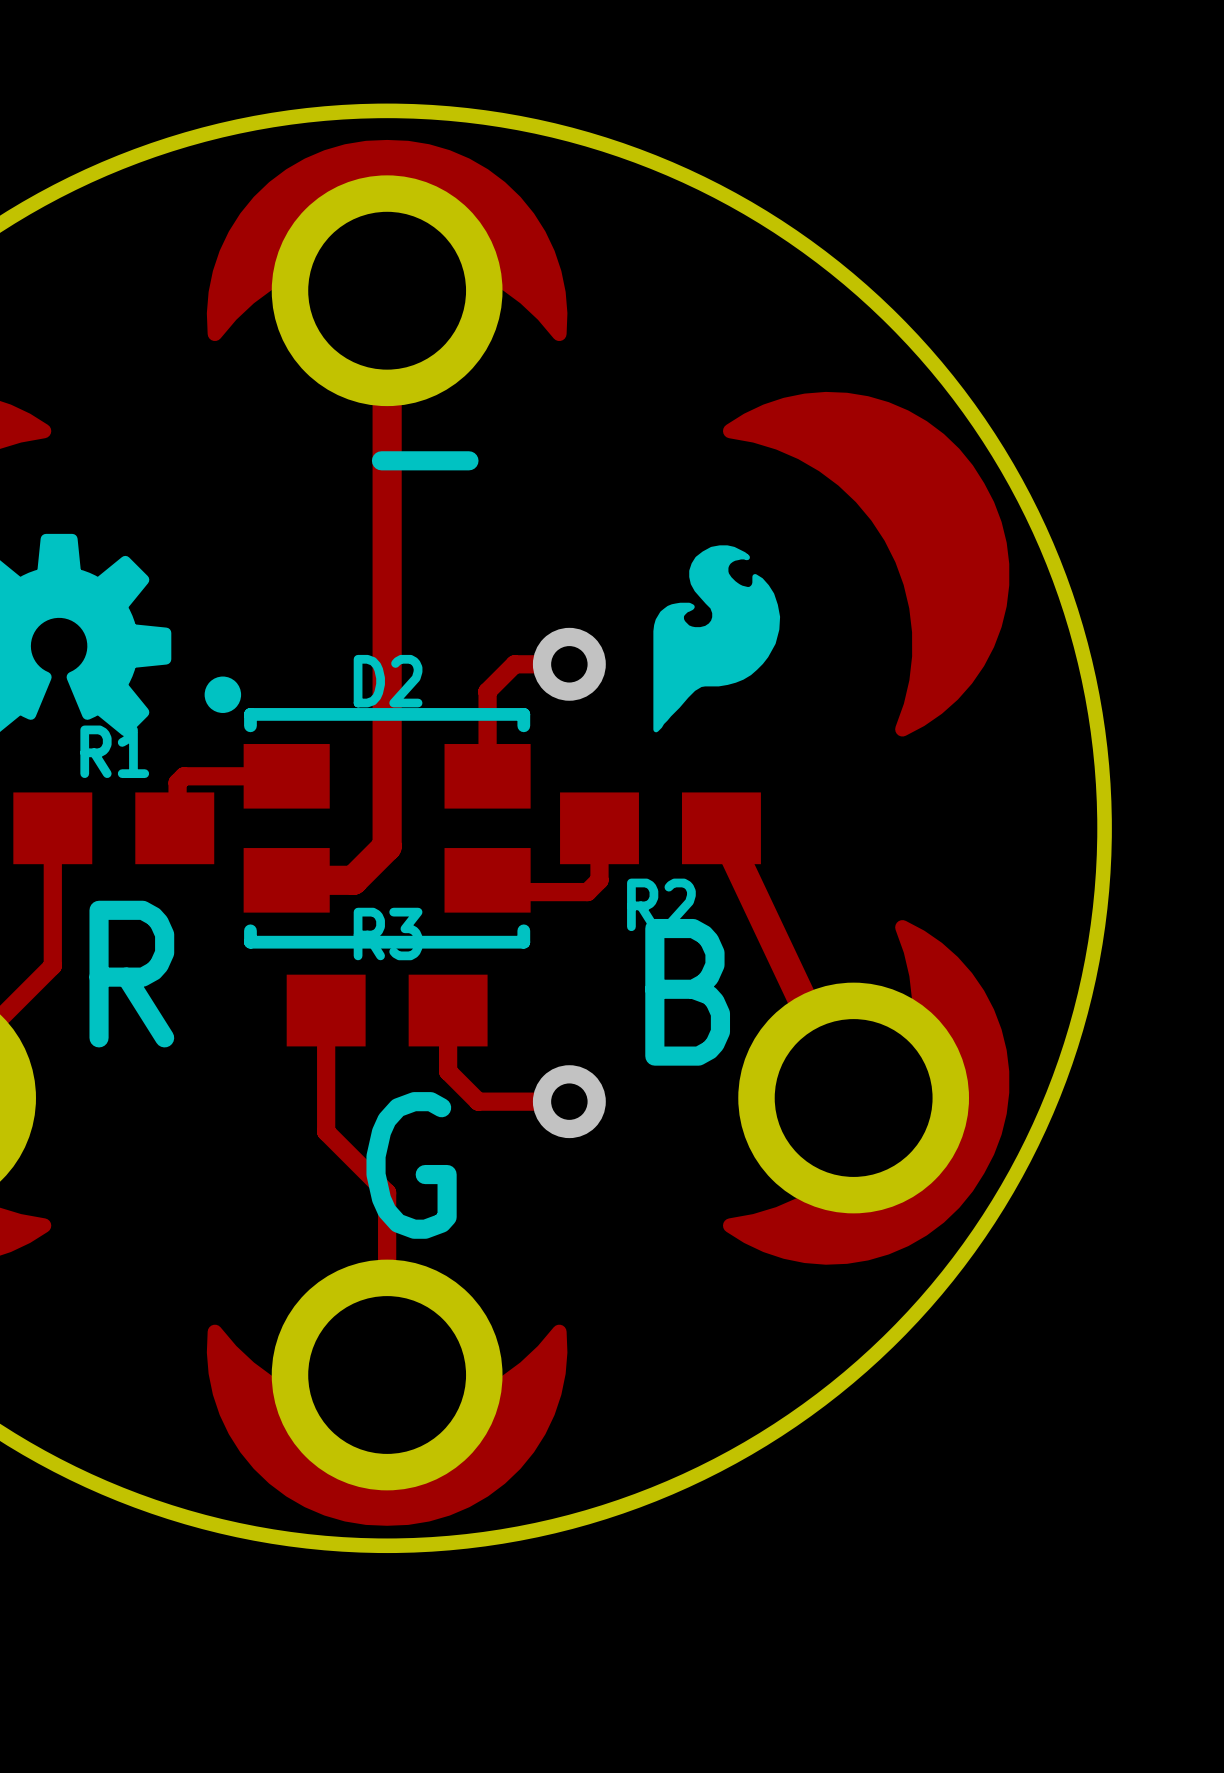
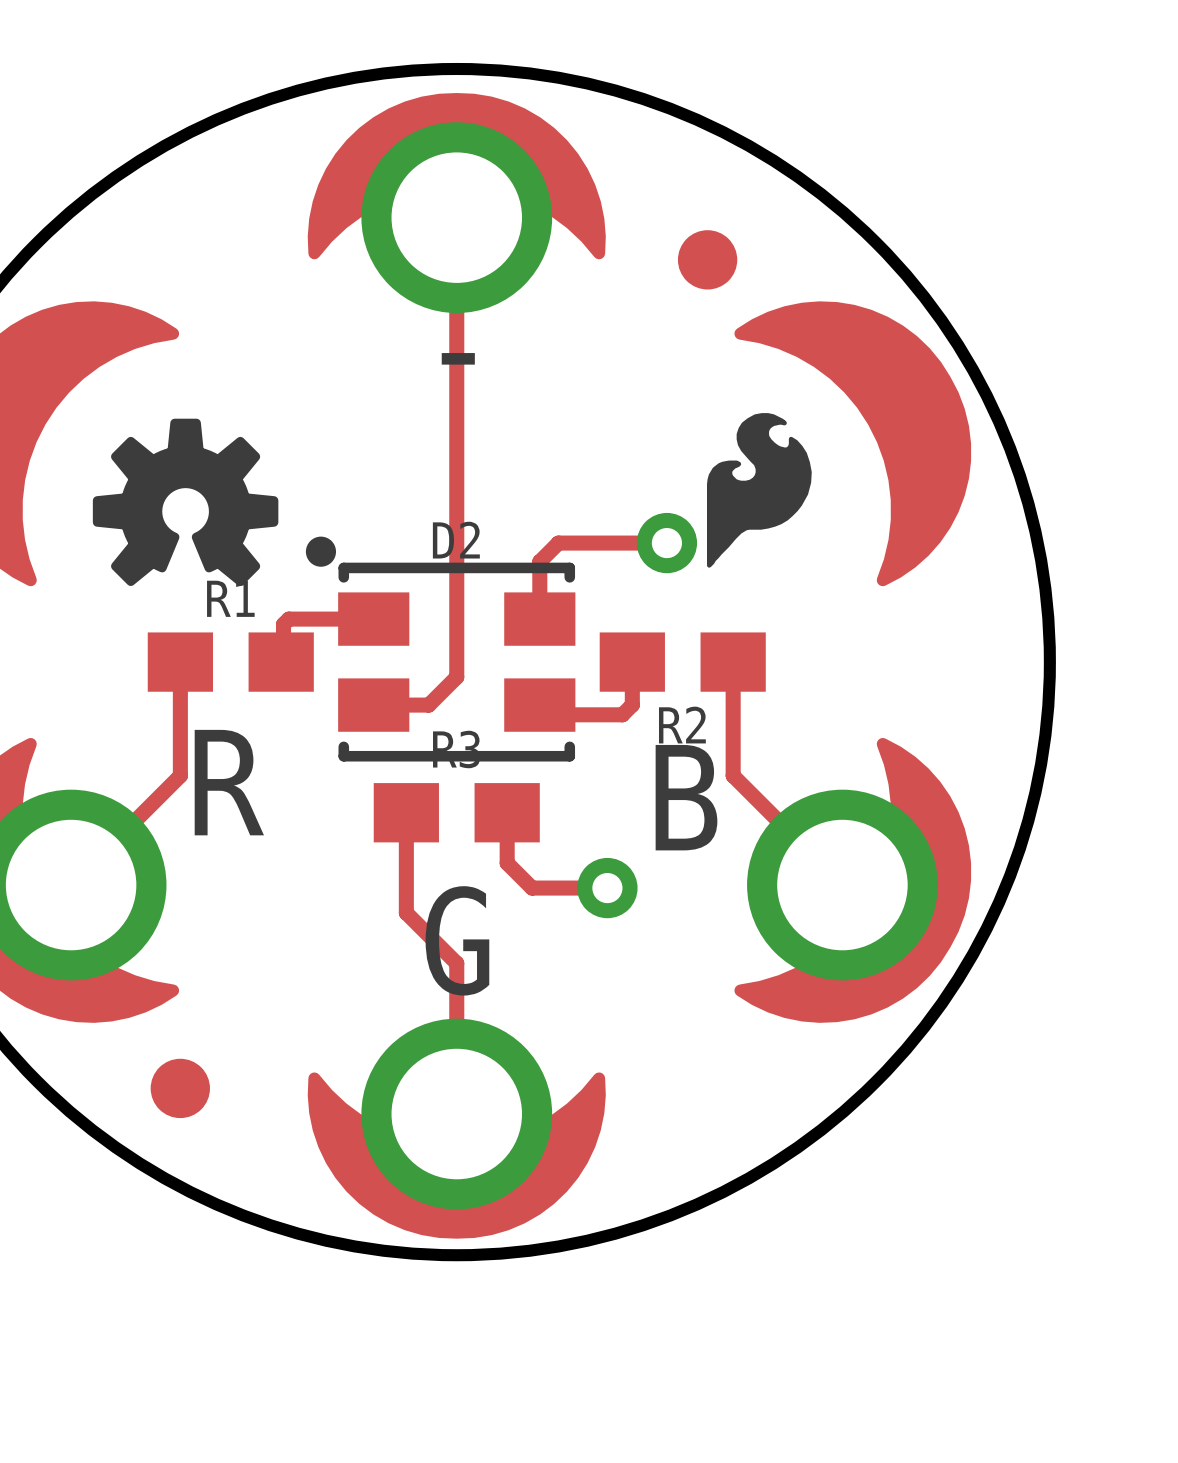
track width: thick (387, 290) (387, 846) (353, 880) (286, 880) -> thin (456, 217) (456, 677) (428, 705) (373, 705)
part: none -> (707, 259)
drawing position: (716, 638) -> (759, 490)
track: (569, 664) (514, 664) (487, 691) (487, 706) -> (666, 543) (558, 543) (539, 561)
via position: (569, 664) -> (666, 543)
track: (721, 828) (844, 1088) -> (733, 662) (733, 775) (834, 877)
part: none -> (180, 1088)

